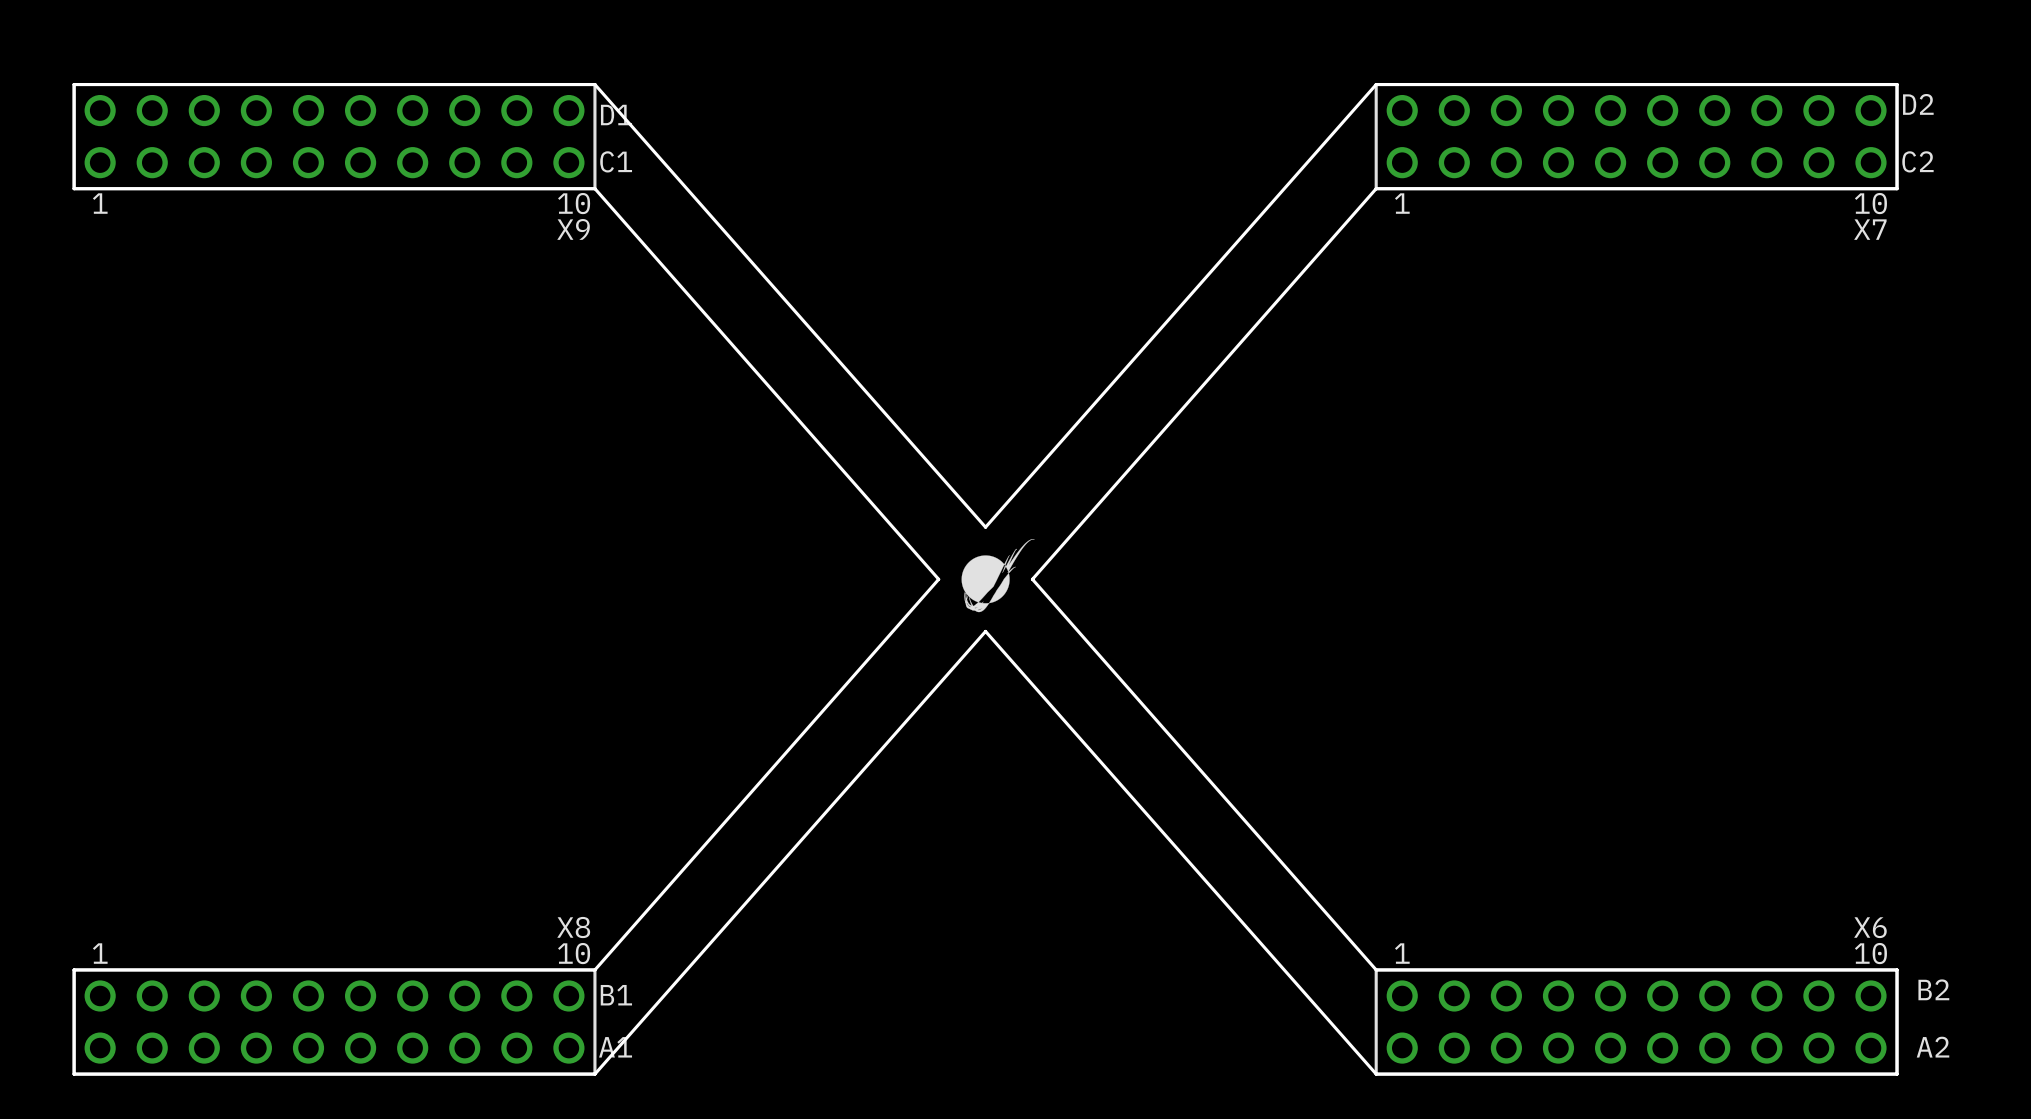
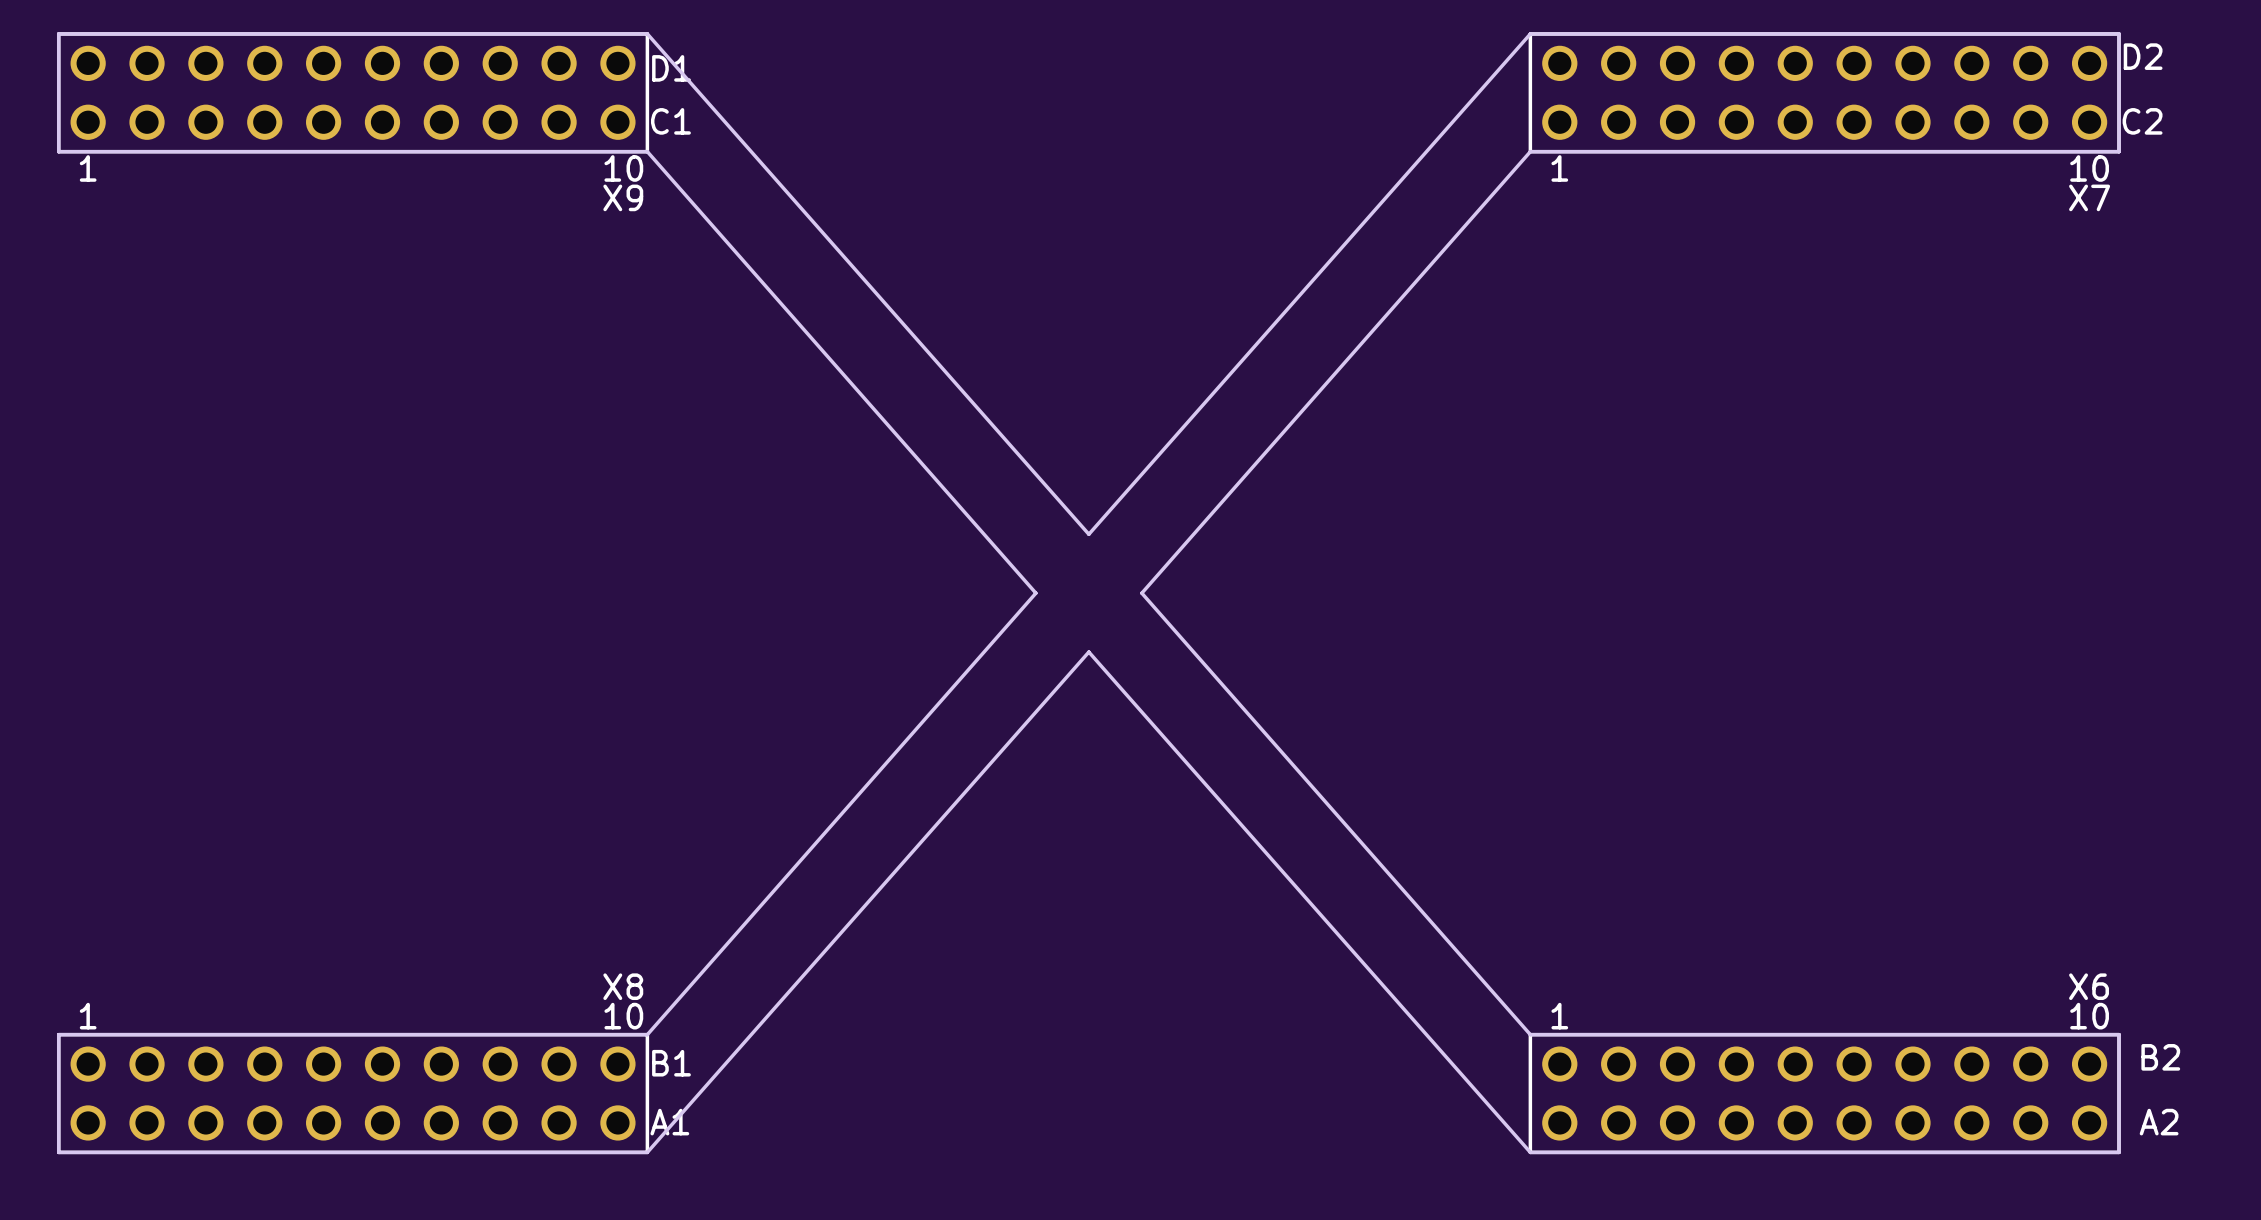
drawing: [961, 539, 1035, 613] -> none

